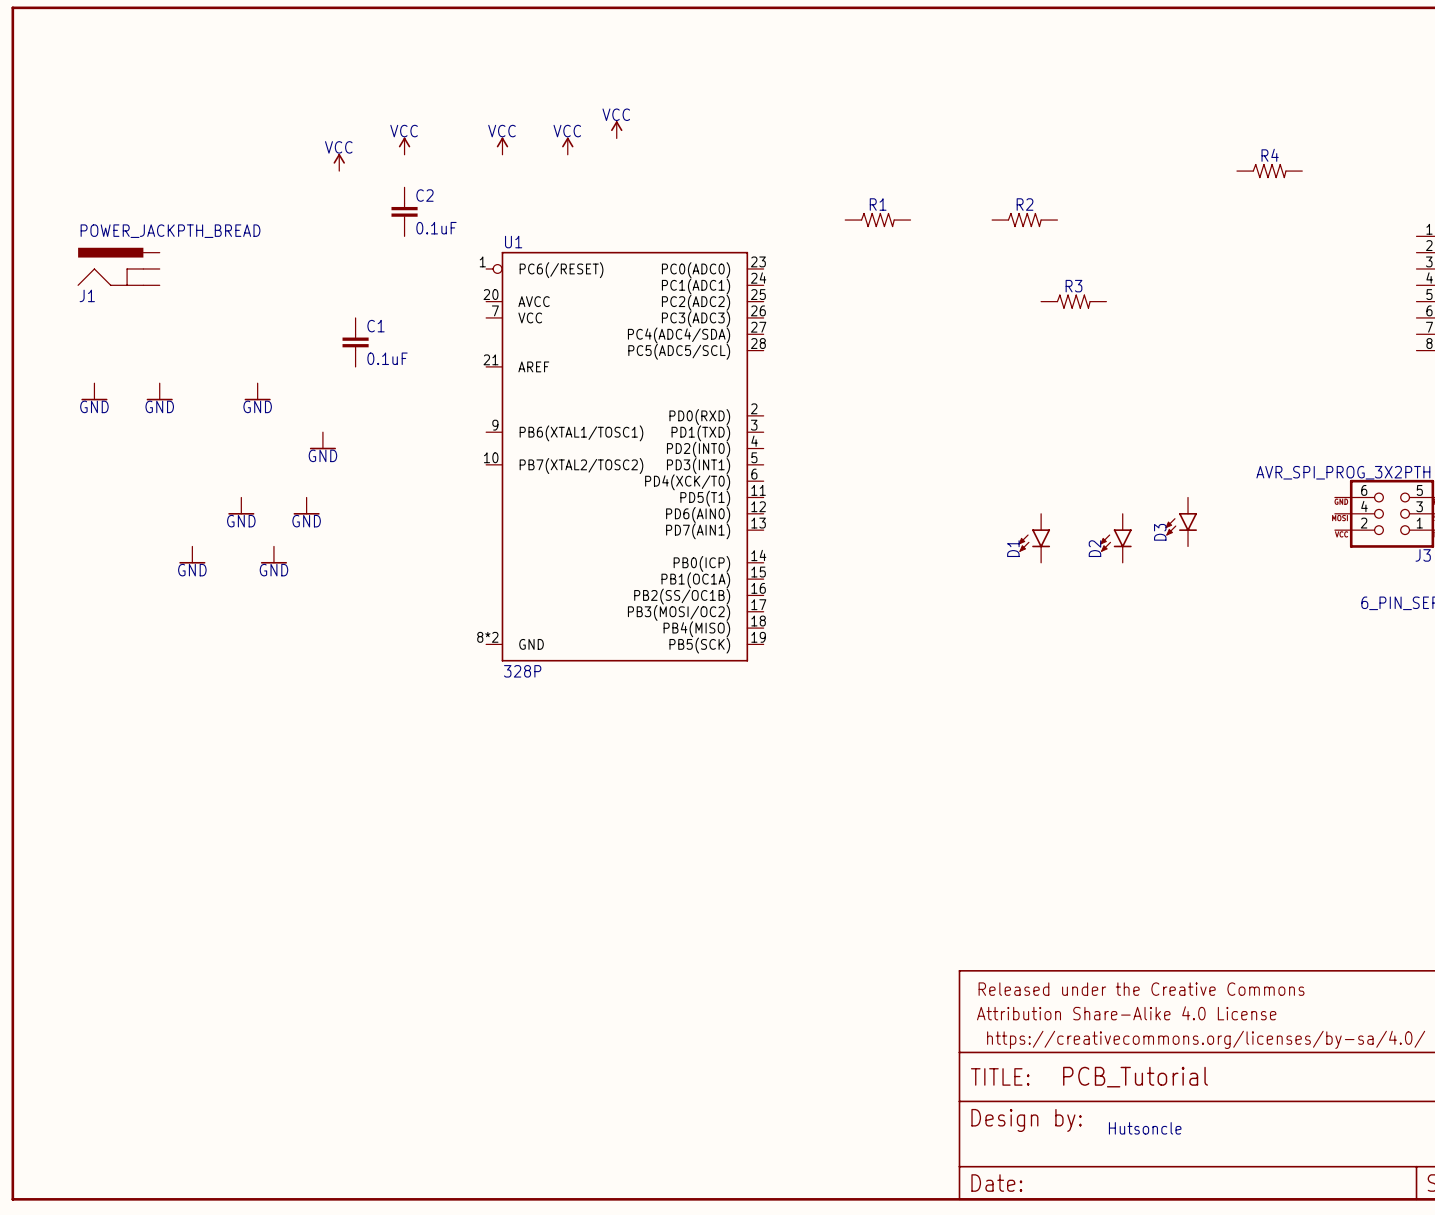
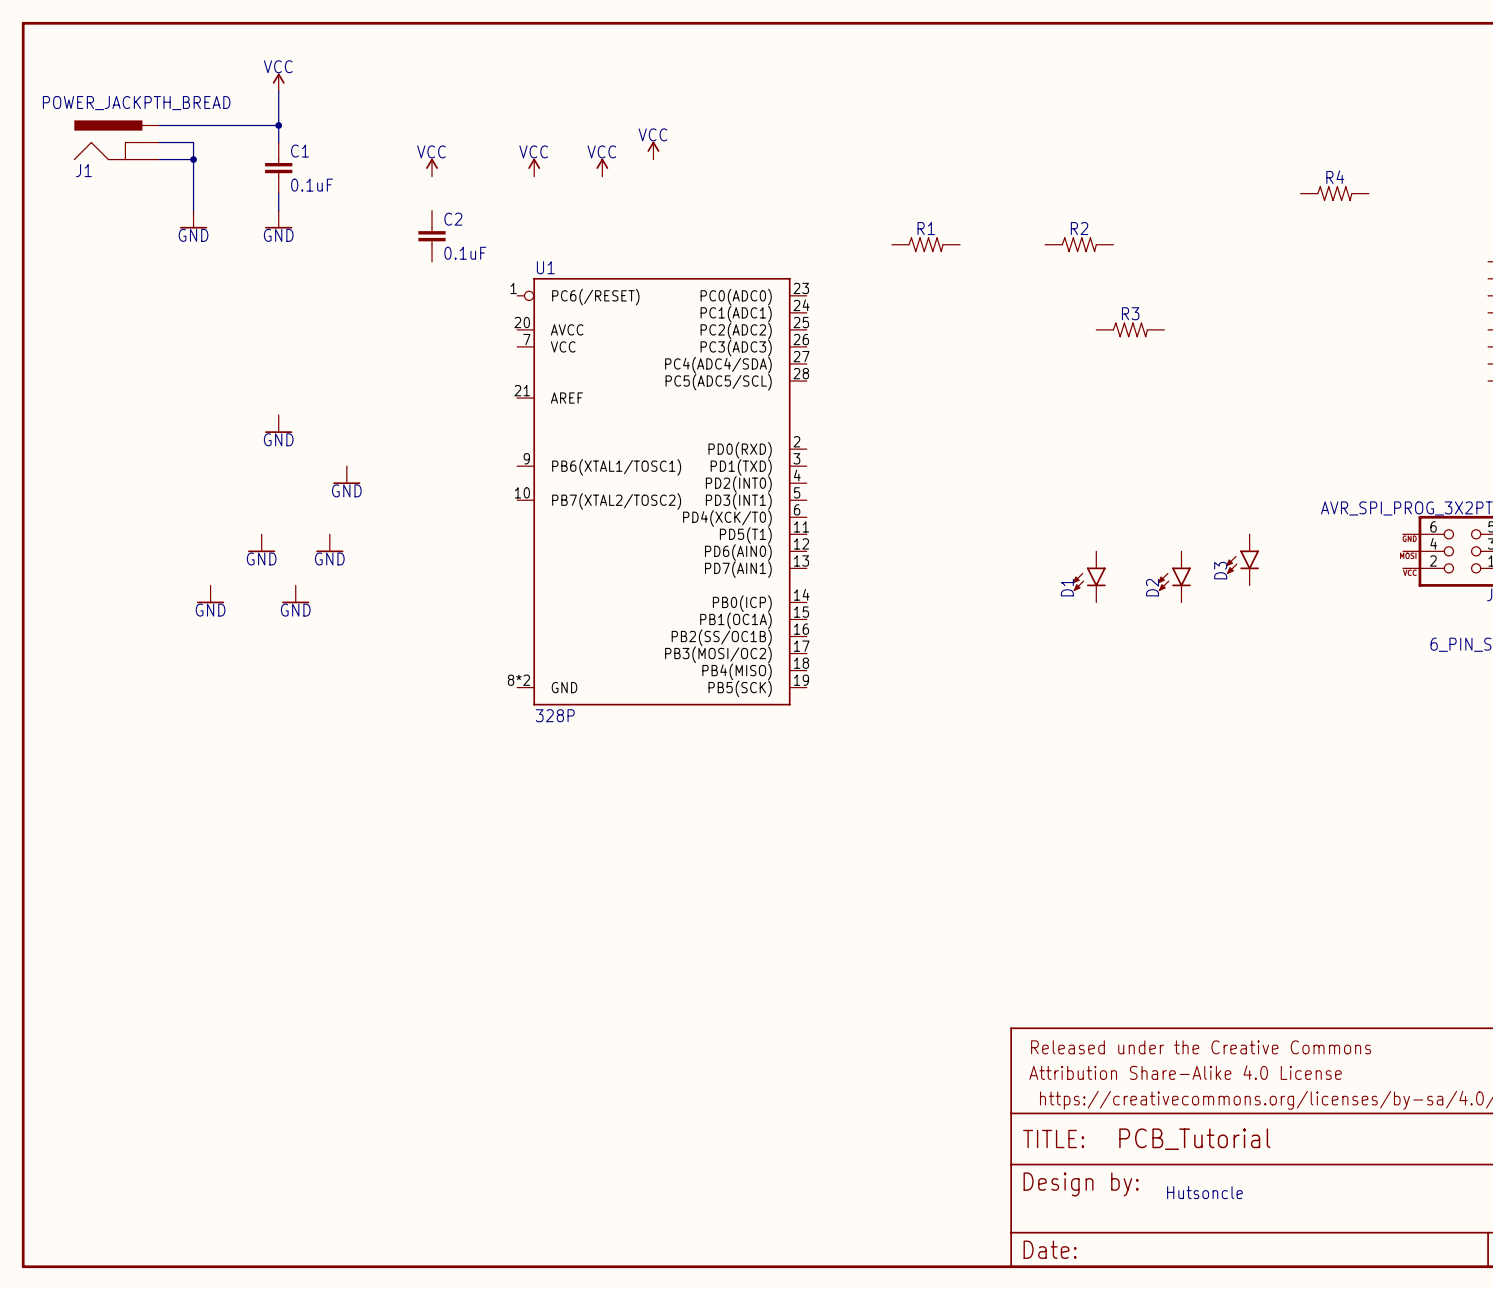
wire: none -> (278, 91) (278, 142)
wire: none -> (159, 125) (278, 125)
junction: none -> (278, 125)
wire: none -> (159, 142) (193, 142) (193, 210)
wire: none -> (159, 159) (193, 159)
junction: none -> (193, 159)
power symbol position: VCC (339, 162) -> VCC (278, 82)
wire: none -> (278, 193) (278, 210)
power symbol: none -> GND (193, 219)
power symbol: none -> GND (278, 219)
J1 value position: POWER_JACKPTH_BREAD (170, 231) -> POWER_JACKPTH_BREAD (136, 103)
J1 position: (118, 266) -> (116, 140)
C1 position: (355, 342) -> (278, 168)
power symbol: GND (94, 391) -> none
power symbol: GND (159, 391) -> none

